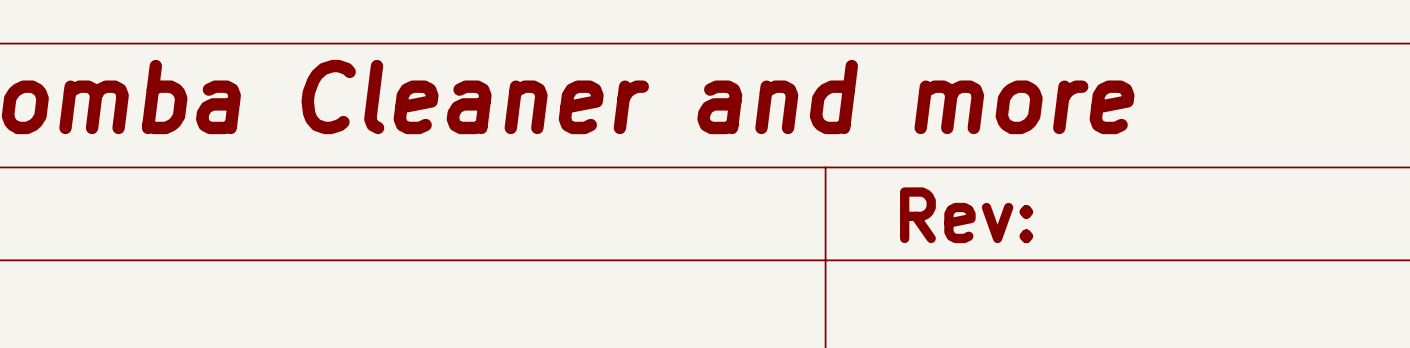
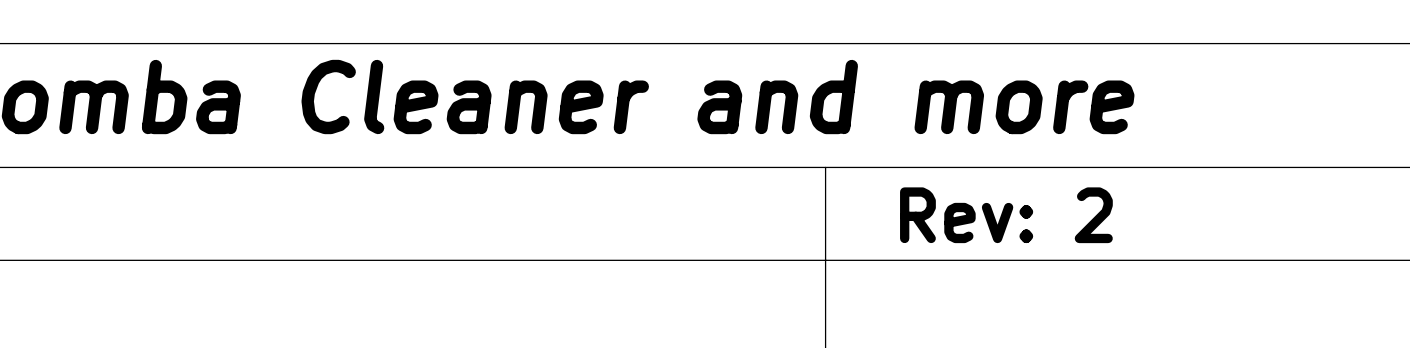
title block: Rev: (966, 215) -> Rev: 2 (1006, 215)

